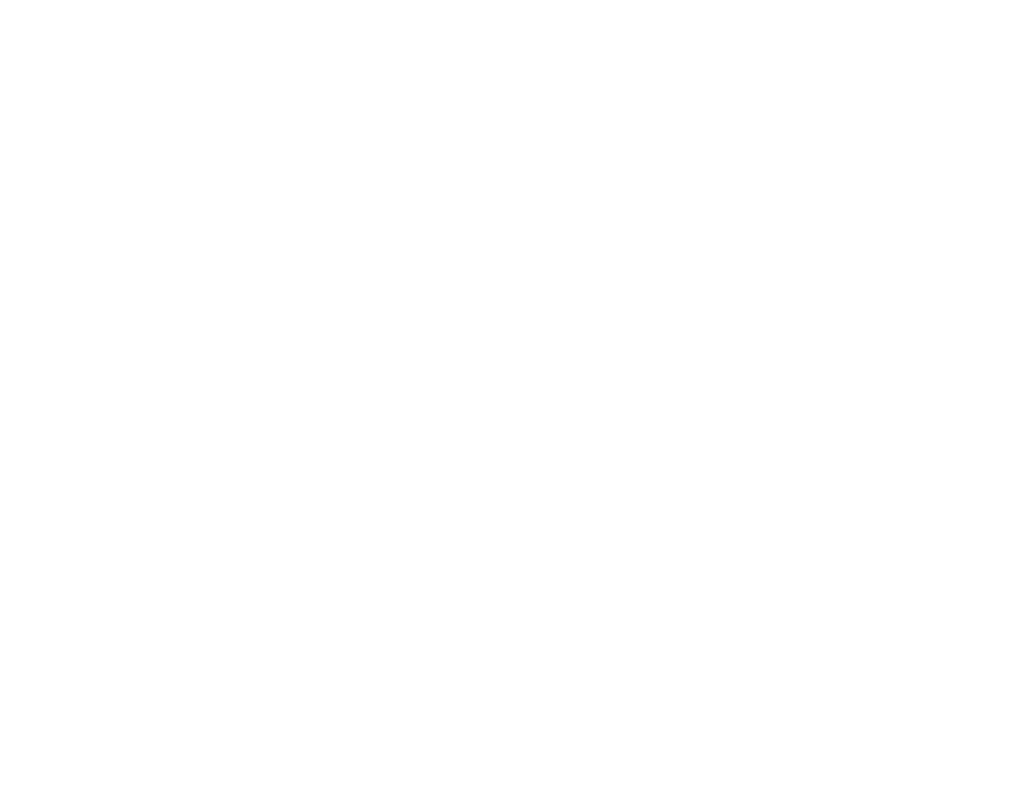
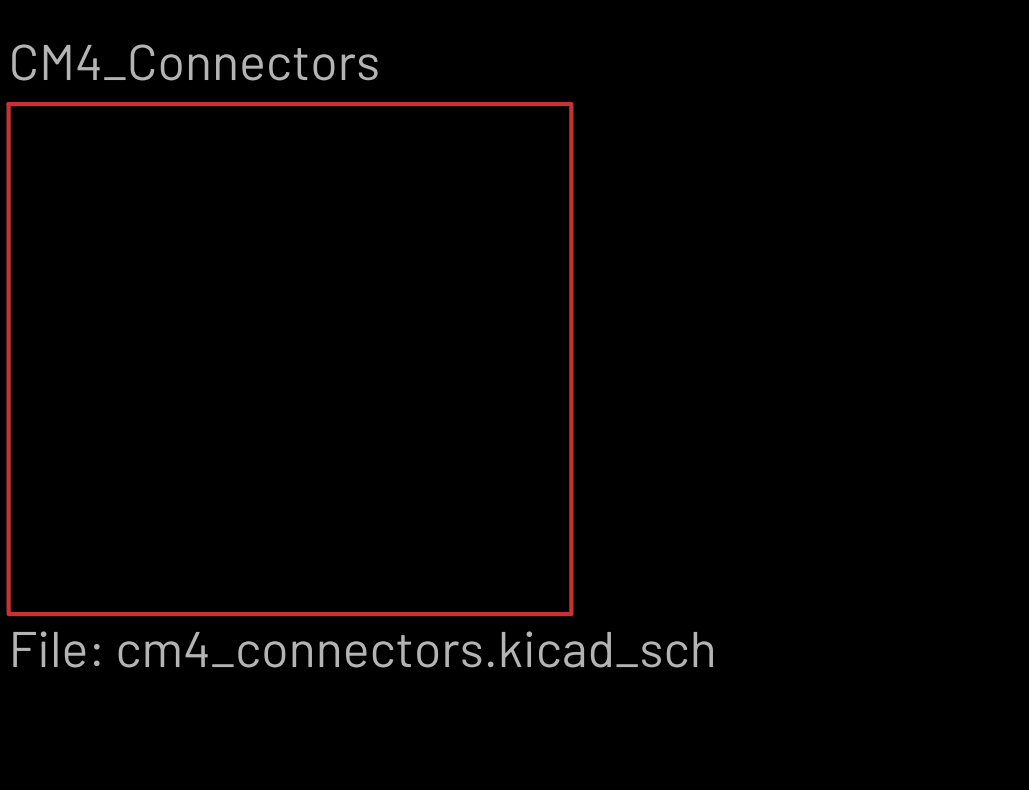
sheet CM4_Connectors: none -> File: cm4_connectors.kicad_sch (289, 359)

